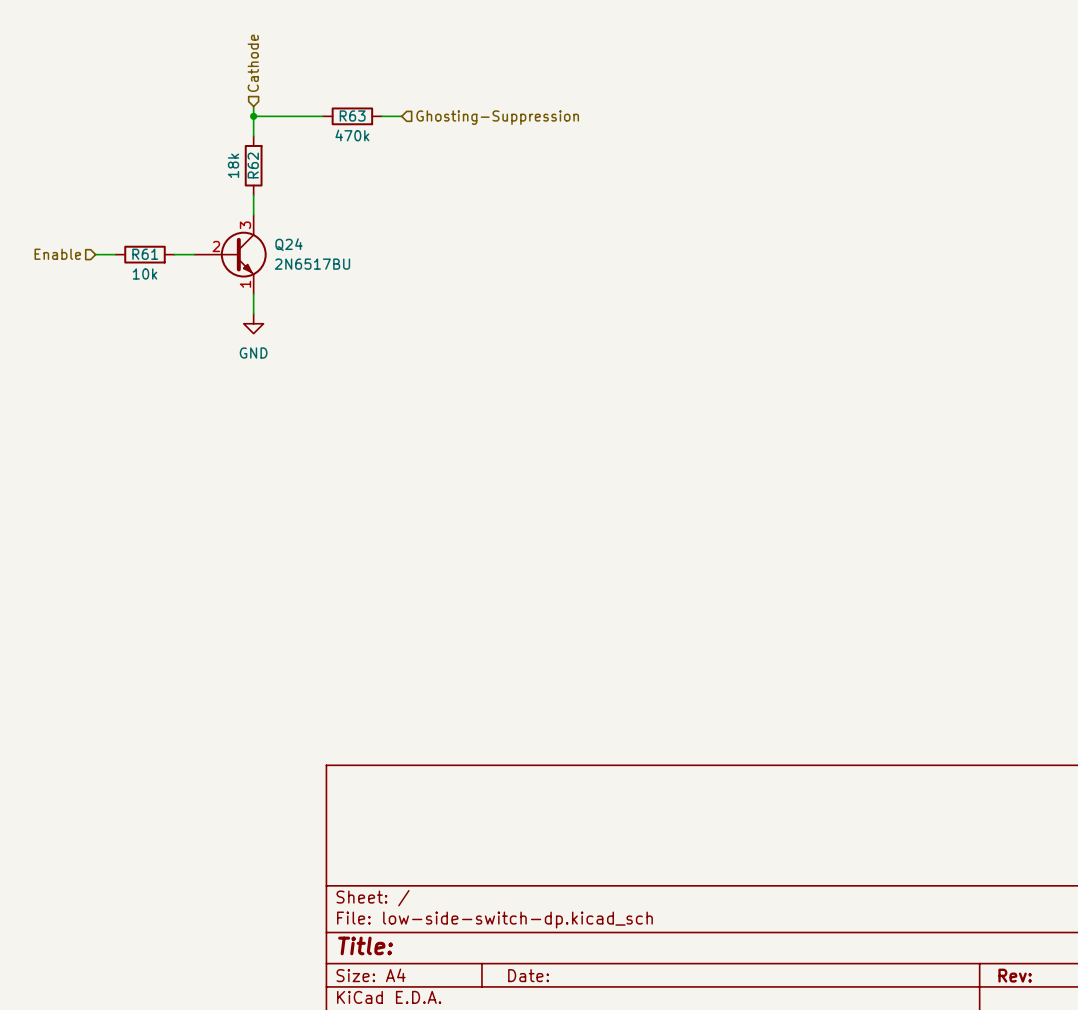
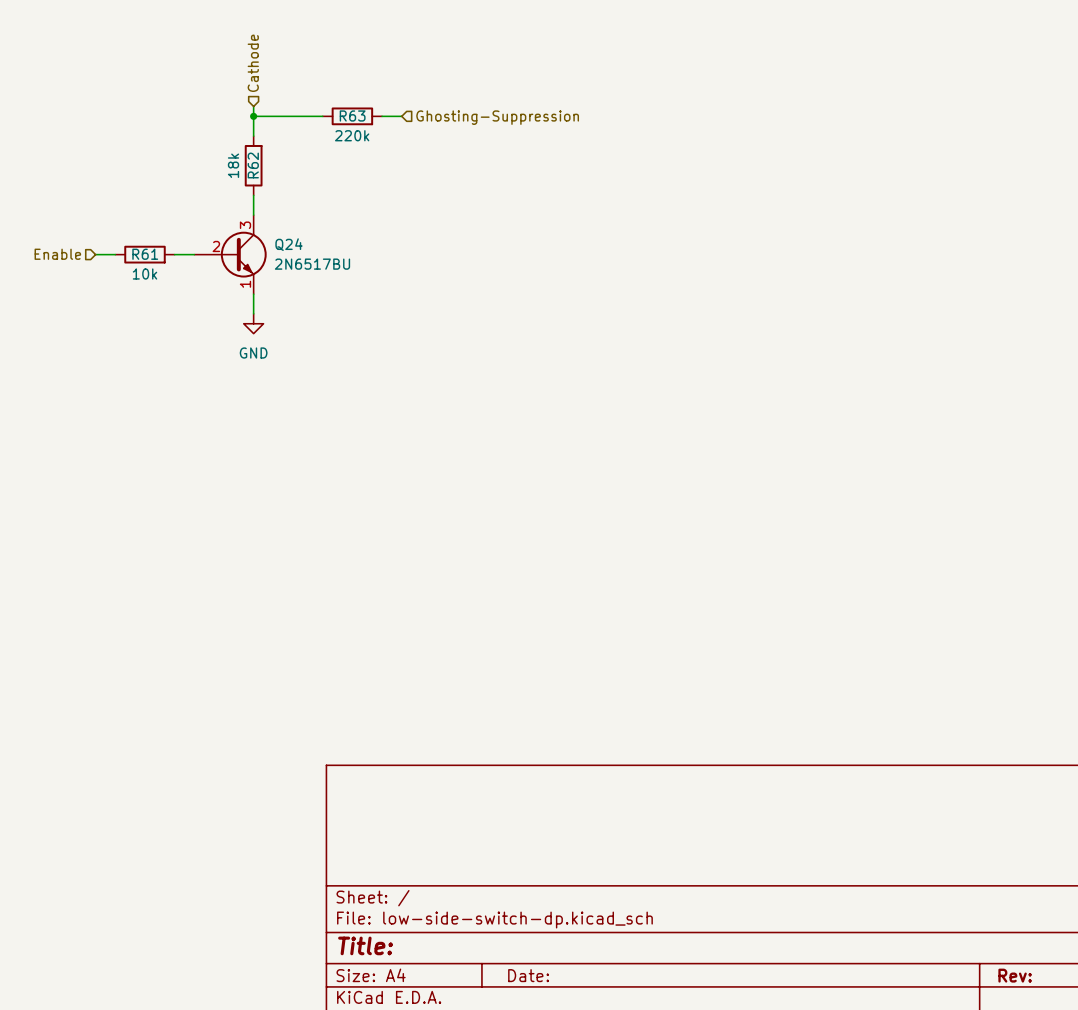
R63 value: 470k (352, 135) -> 220k (352, 135)

